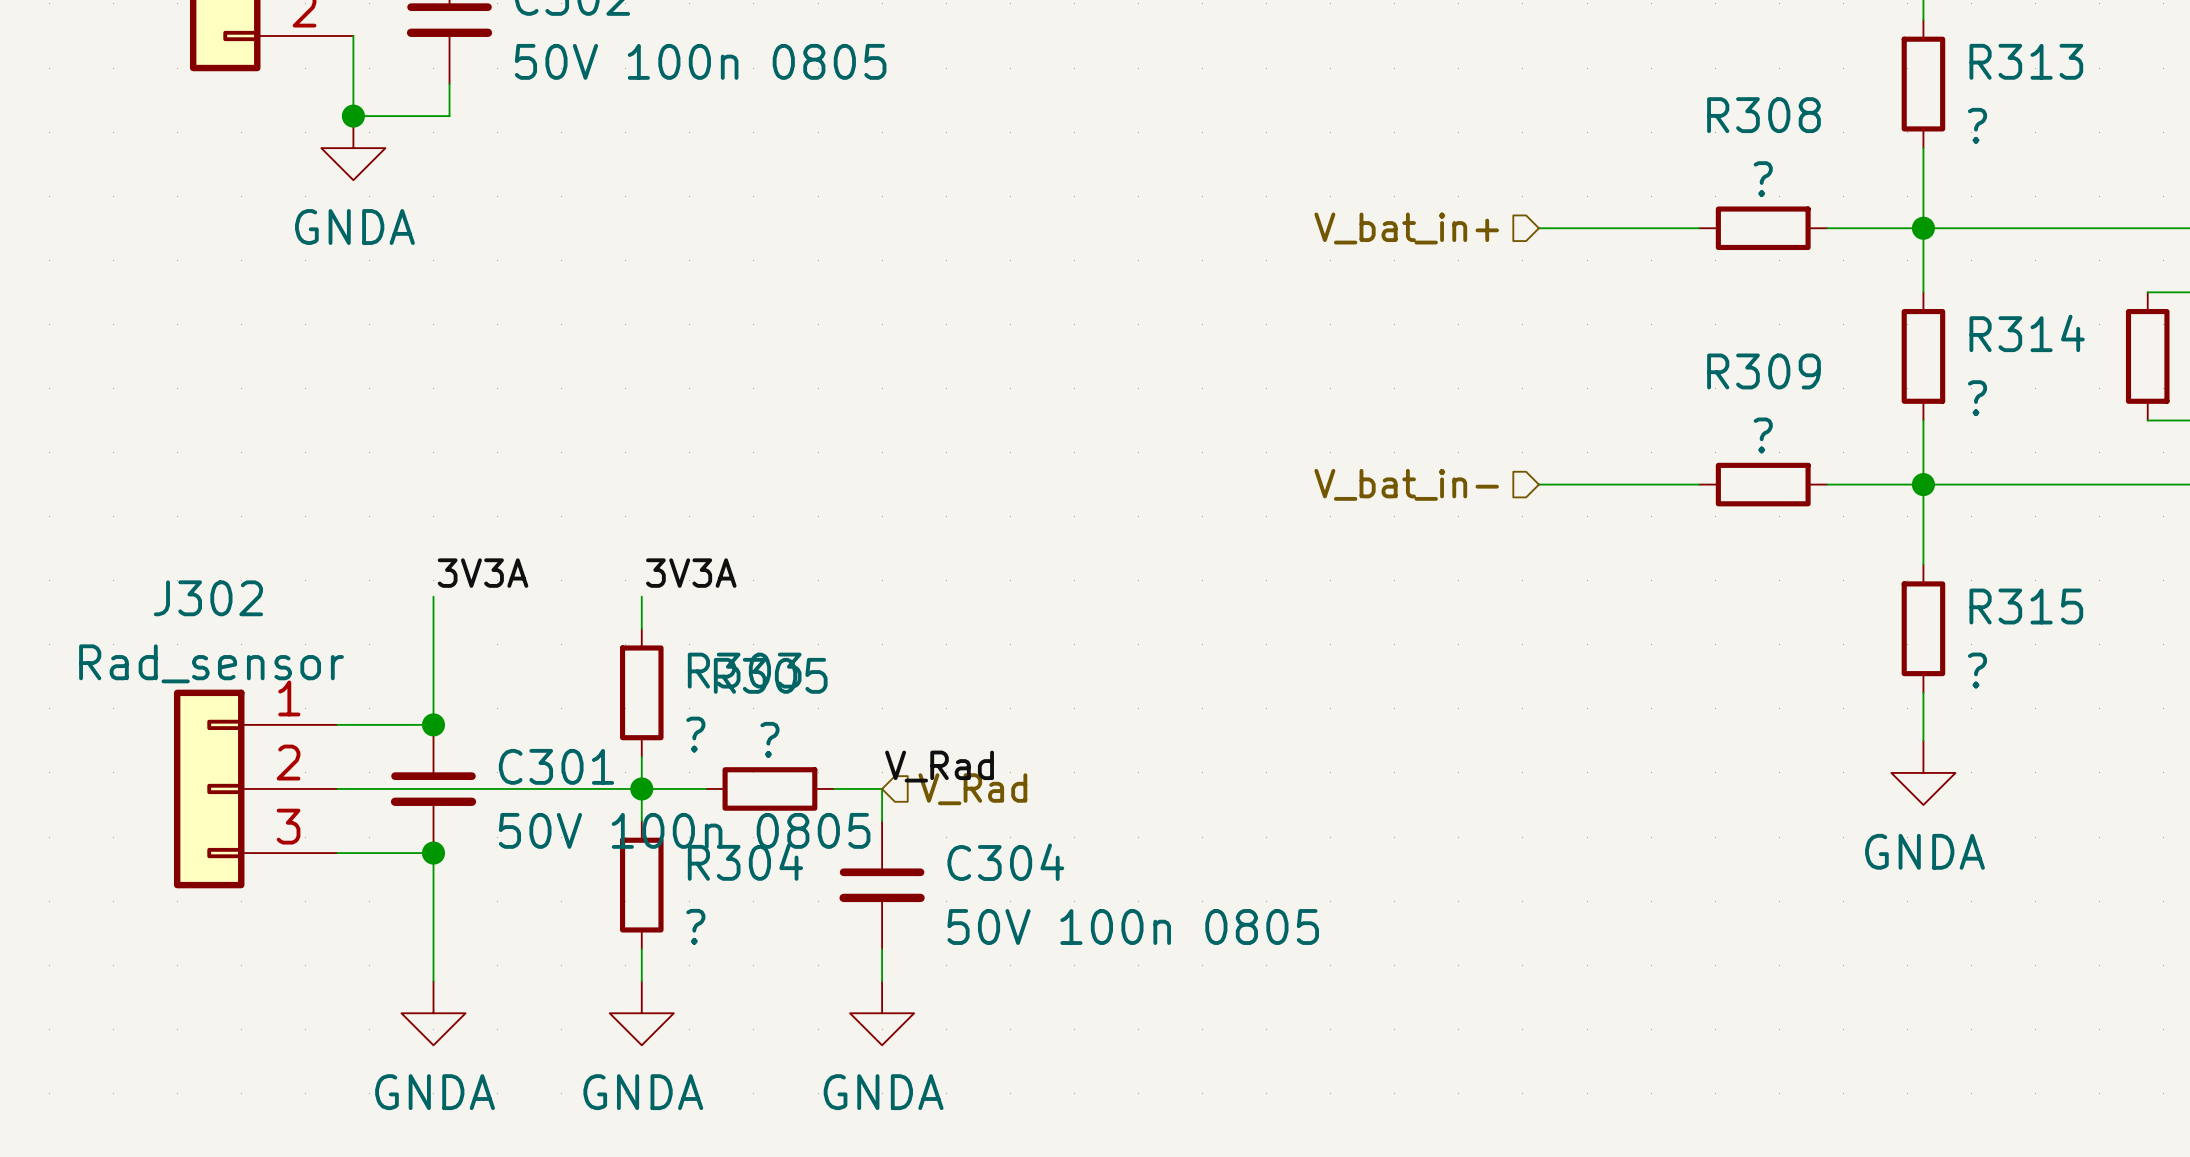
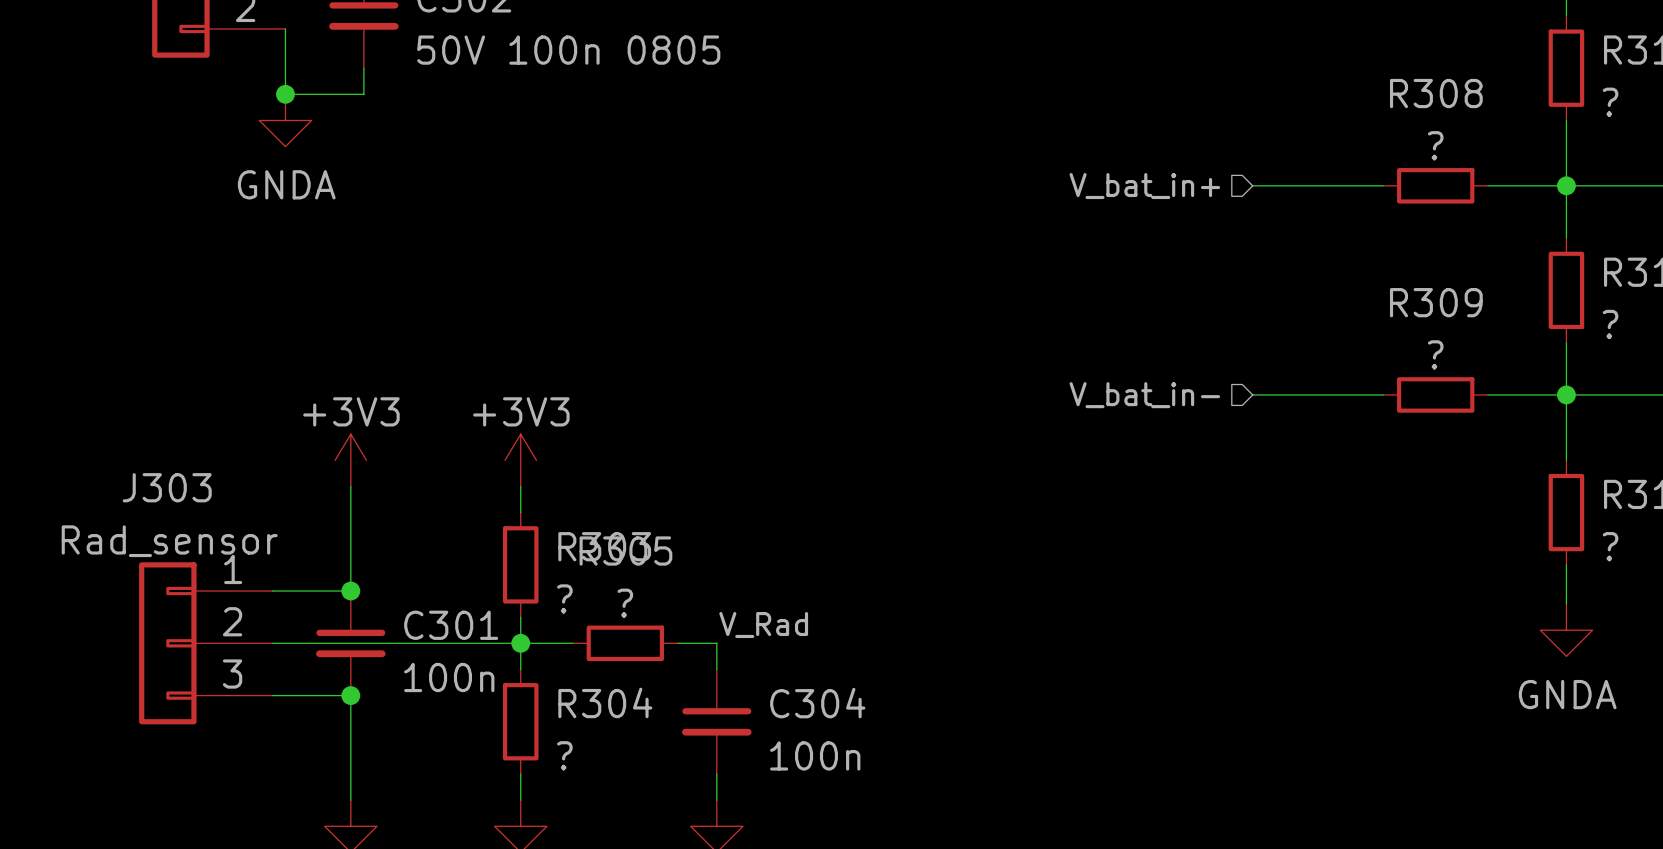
power symbol: none -> +3V3 (350, 460)
power symbol: none -> +3V3 (520, 460)
label: 3V3A (483, 573) -> none
label: 3V3A (691, 573) -> none
J302 name: J302 (208, 598) -> J303 (167, 487)
hierarchical label: V_Rad (972, 789) -> none
C301 value: 50V 100n 0805 (684, 830) -> 100n (449, 677)
C304 value: 50V 100n 0805 (1133, 927) -> 100n (815, 755)

